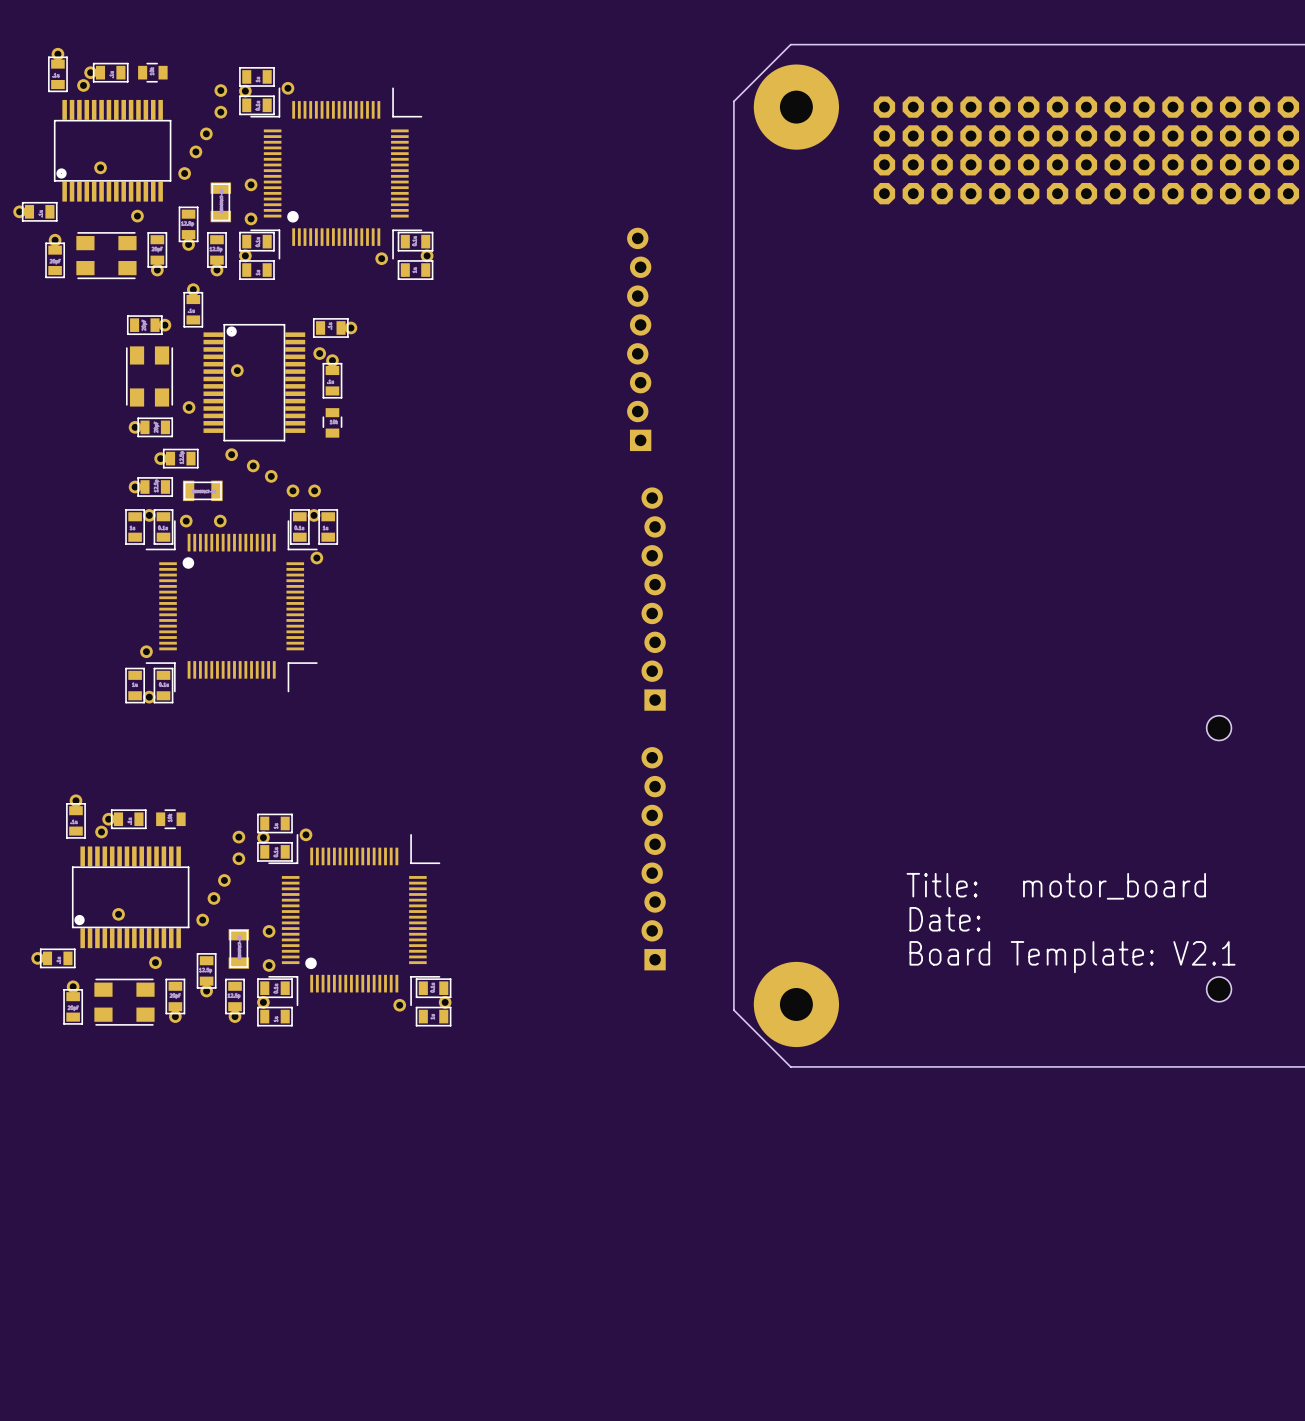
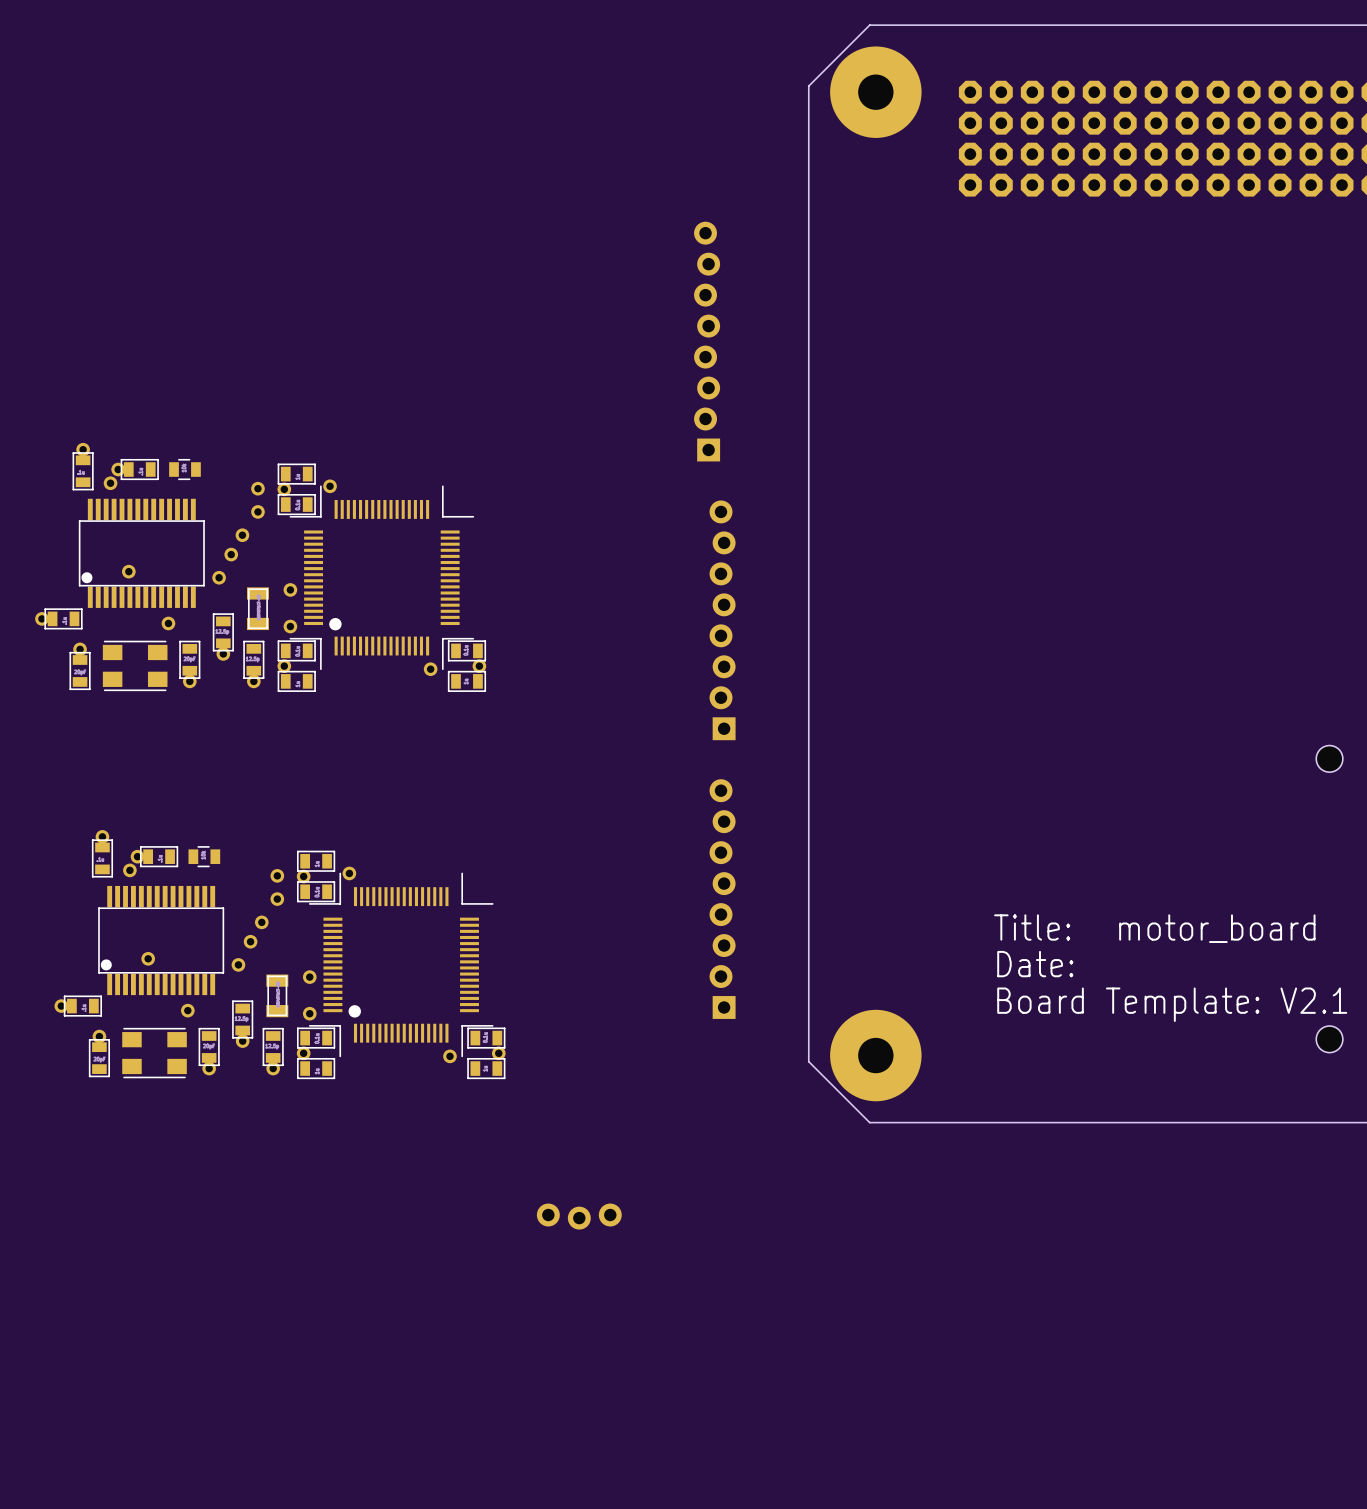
part: (223, 163) -> none
part: (241, 493) -> none
part: none -> (260, 567)
part: none -> (579, 1216)

